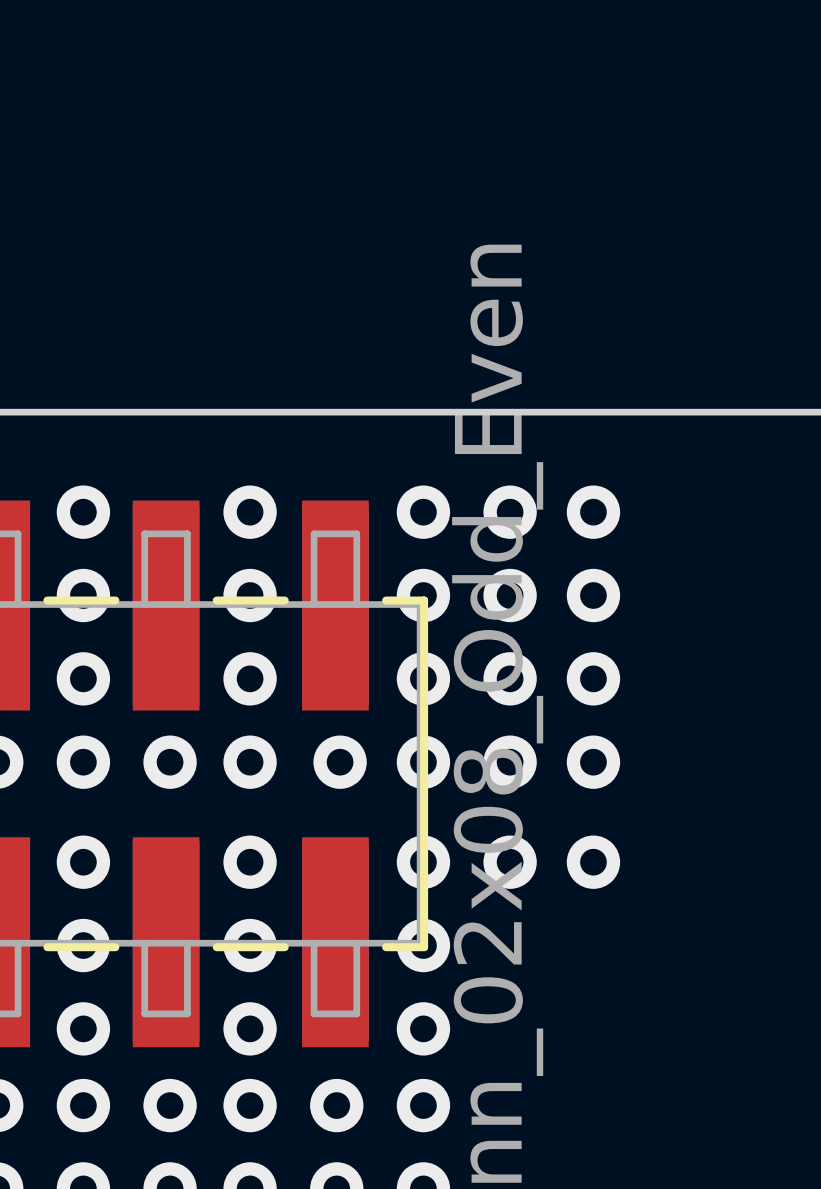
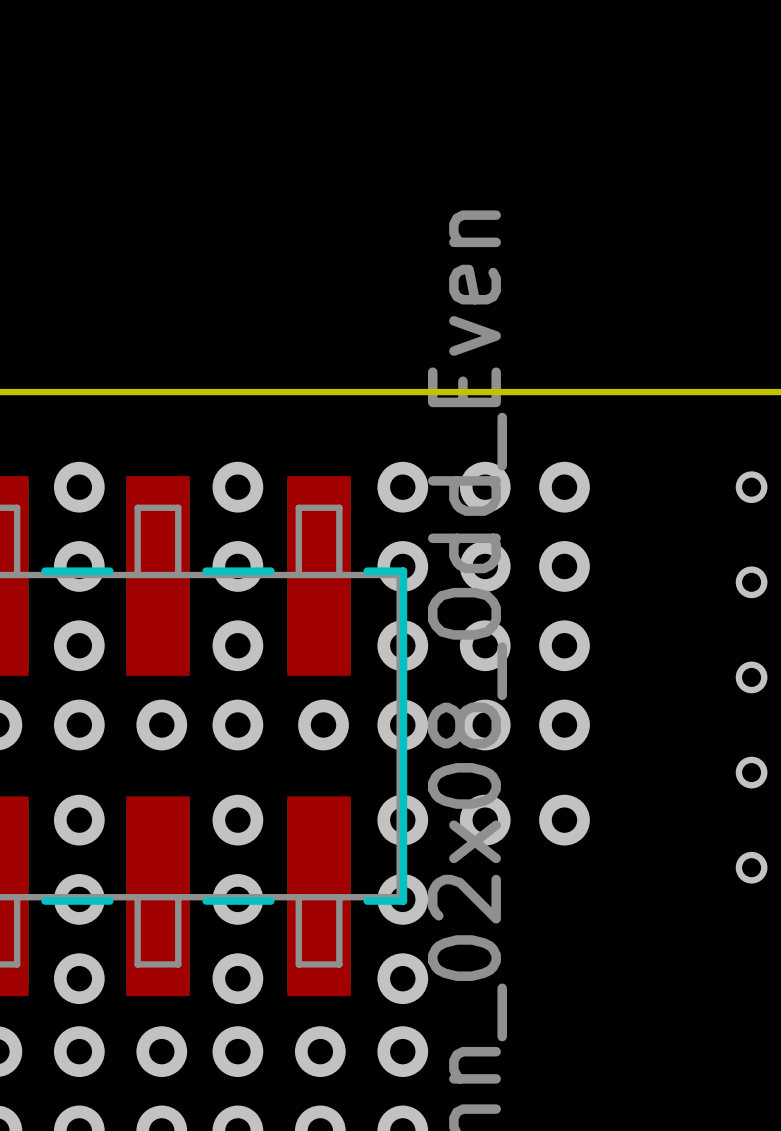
via: none -> (751, 487)
via: none -> (751, 582)
via: none -> (751, 677)
via: none -> (751, 772)
via: none -> (751, 867)

